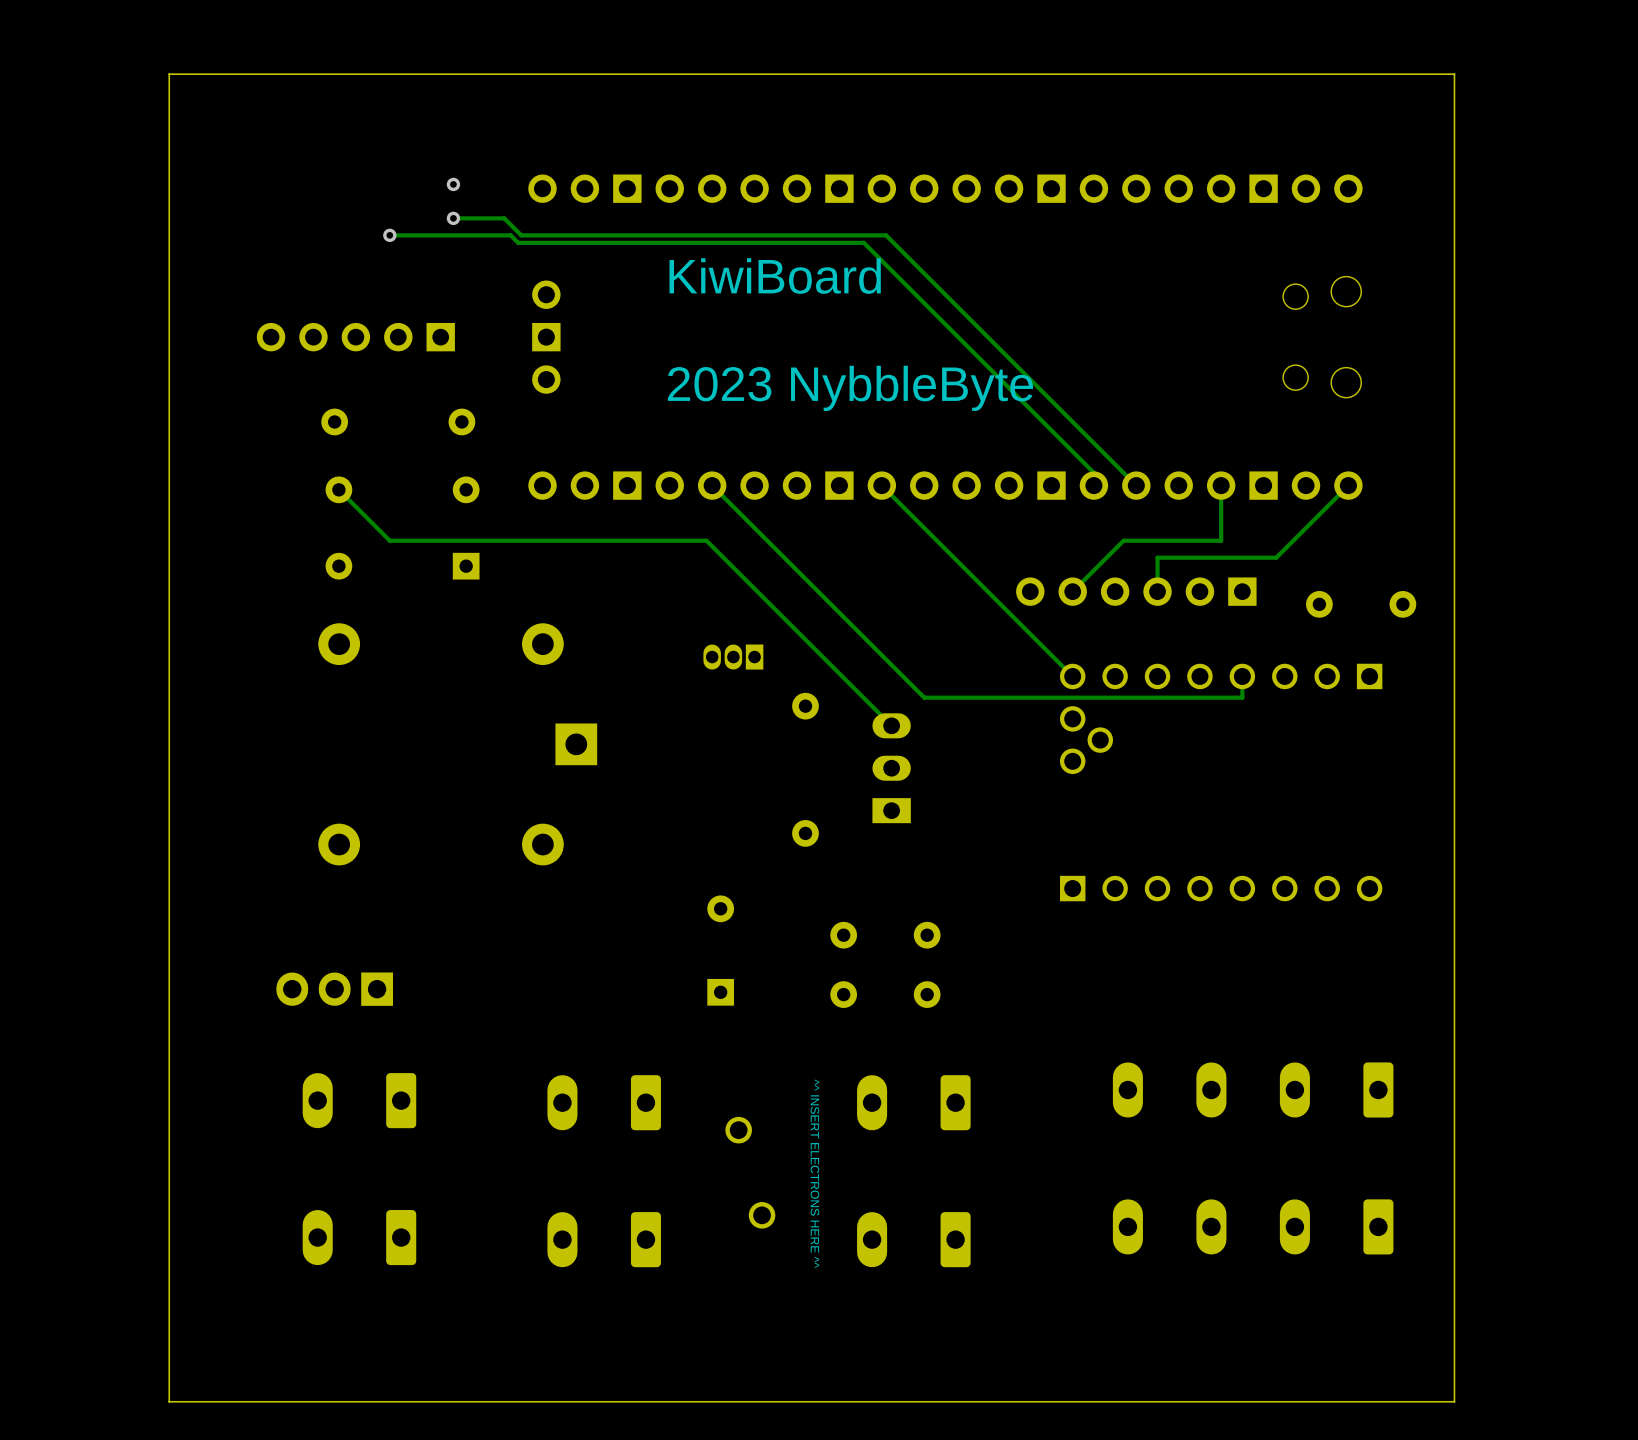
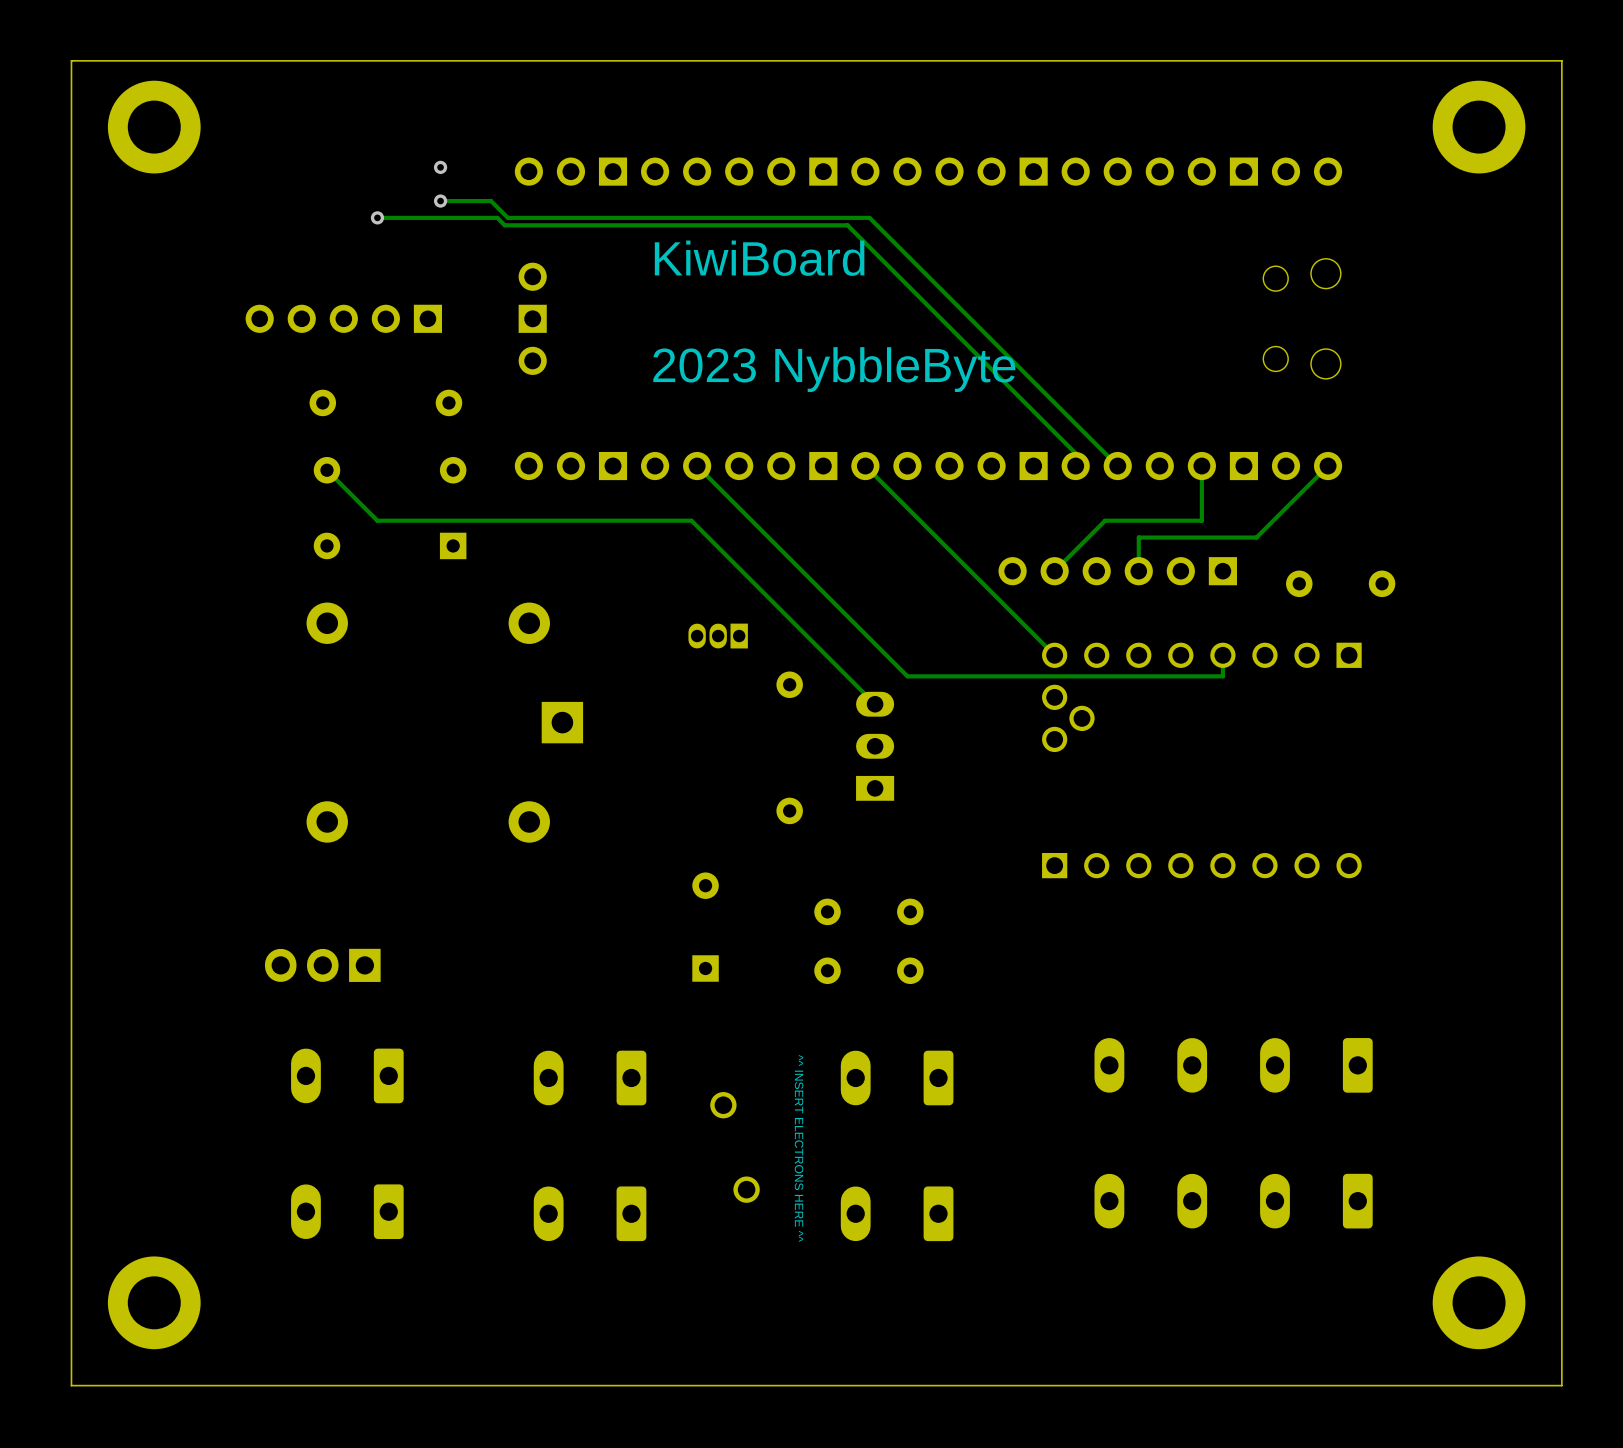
board edge: (1454, 74) (169, 74) (169, 1401) (1454, 1401) (1454, 74) -> (1561, 60) (1561, 1385) (71, 1385) (71, 60) (1561, 60)
part: none -> (154, 127)
part: none -> (1479, 127)
part: none -> (154, 1302)
part: none -> (1479, 1302)

